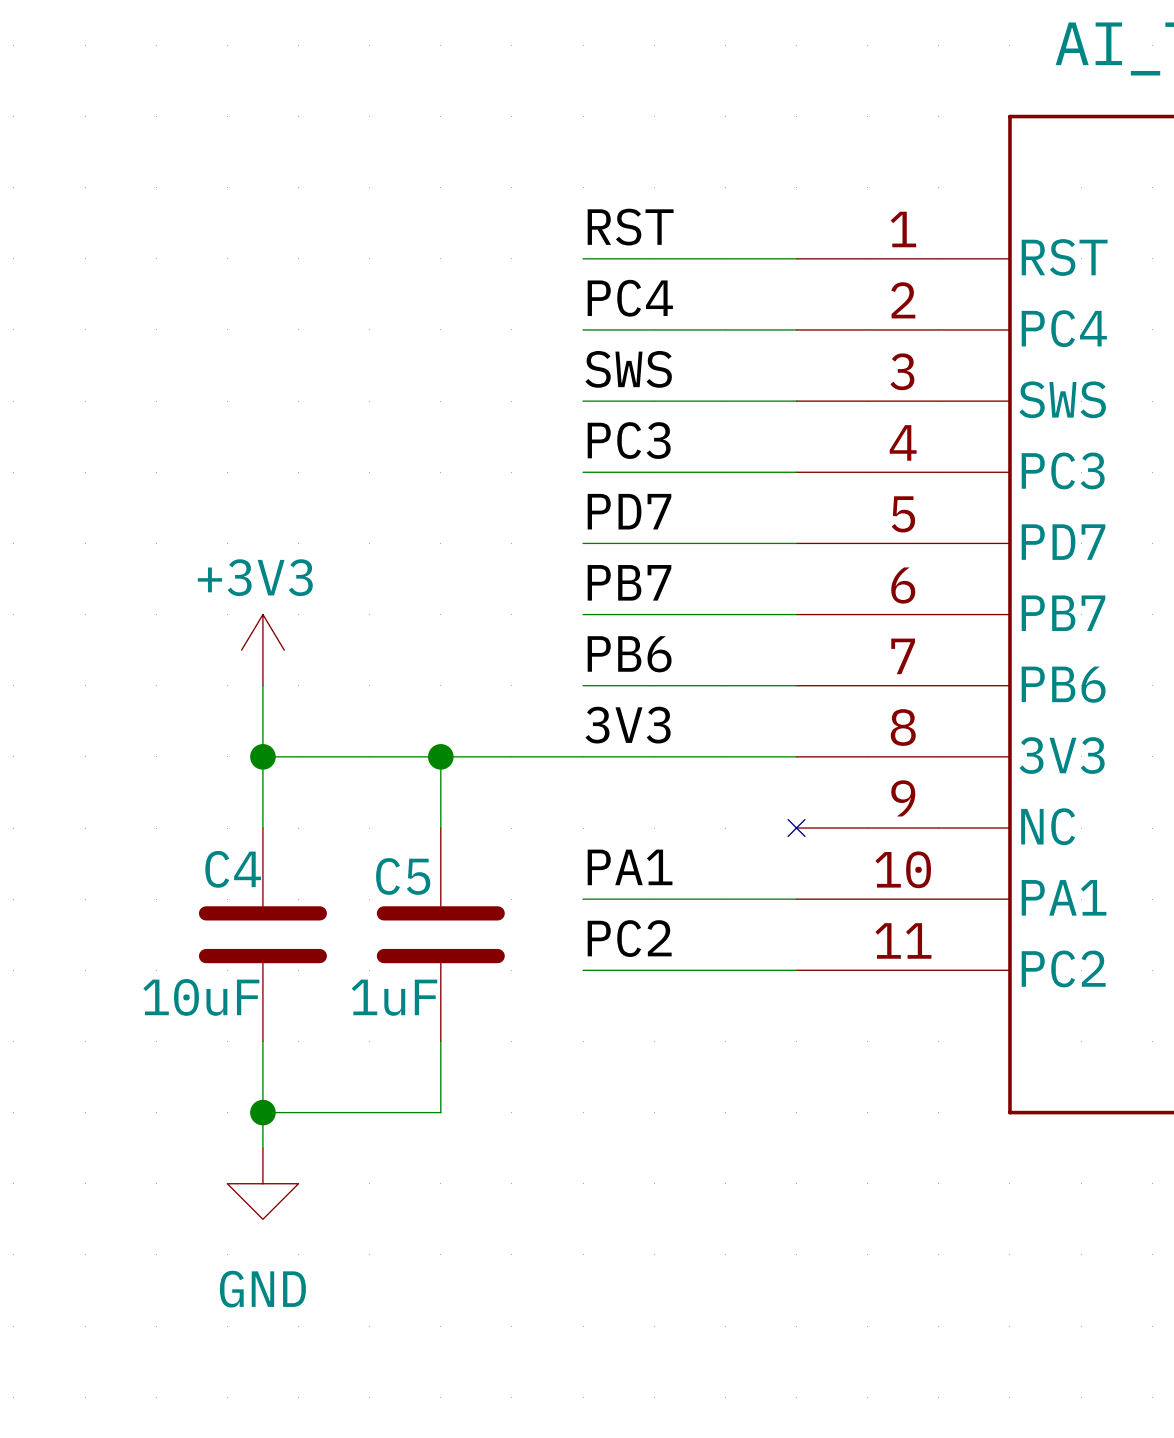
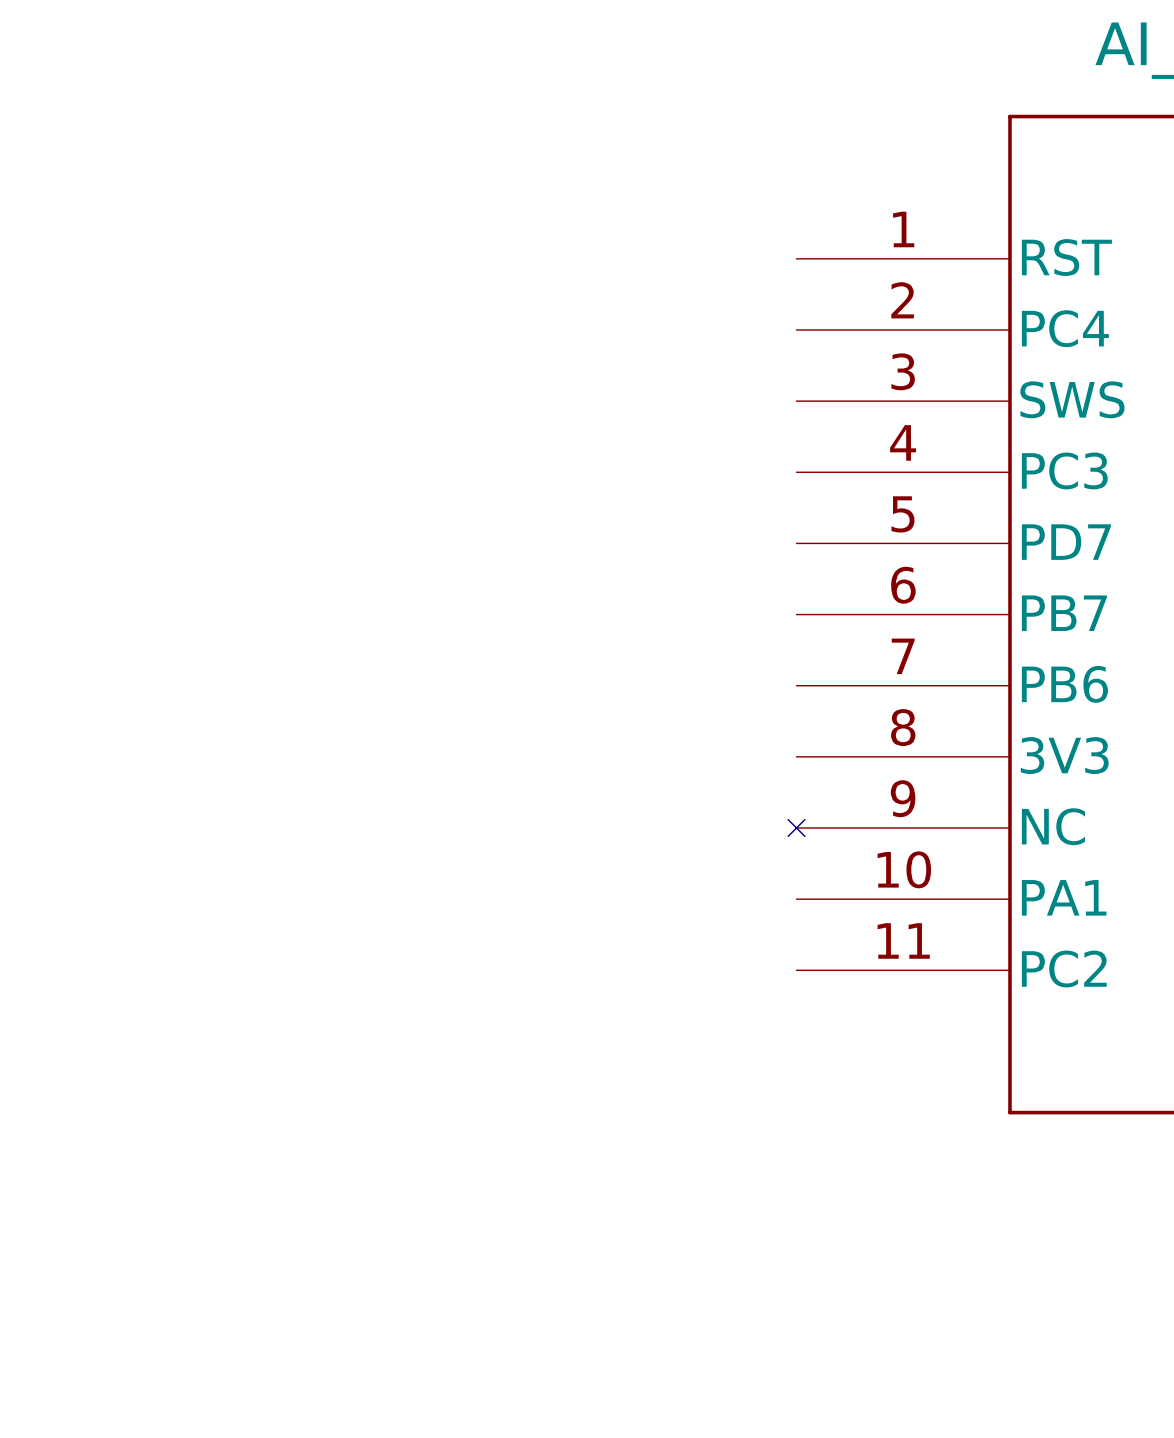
label: RST (630, 227) -> none
wire: (583, 258) (796, 258) -> none
label: PC4 (630, 298) -> none
wire: (583, 329) (796, 329) -> none
label: SWS (628, 369) -> none
wire: (583, 401) (796, 401) -> none
label: PC3 (629, 440) -> none
wire: (583, 472) (796, 472) -> none
label: PD7 (629, 511) -> none
wire: (583, 543) (796, 543) -> none
label: PB7 (629, 582) -> none
wire: (583, 614) (796, 614) -> none
power symbol: +3V3 (262, 650) -> none
label: PB6 (629, 654) -> none
wire: (262, 685) (262, 828) -> none
wire: (583, 685) (796, 685) -> none
label: 3V3 (628, 725) -> none
wire: (262, 756) (796, 756) -> none
junction: (262, 756) -> none
wire: (440, 756) (440, 828) -> none
junction: (440, 756) -> none
label: PA1 (630, 867) -> none
wire: (583, 899) (796, 899) -> none
C4: 10uF (262, 934) -> none
C5: 1uF (440, 934) -> none
label: PC2 (629, 938) -> none
wire: (583, 970) (796, 970) -> none
wire: (262, 1041) (262, 1148) -> none
wire: (440, 1041) (440, 1112) (262, 1112) -> none
junction: (262, 1112) -> none
power symbol: GND (262, 1183) -> none

